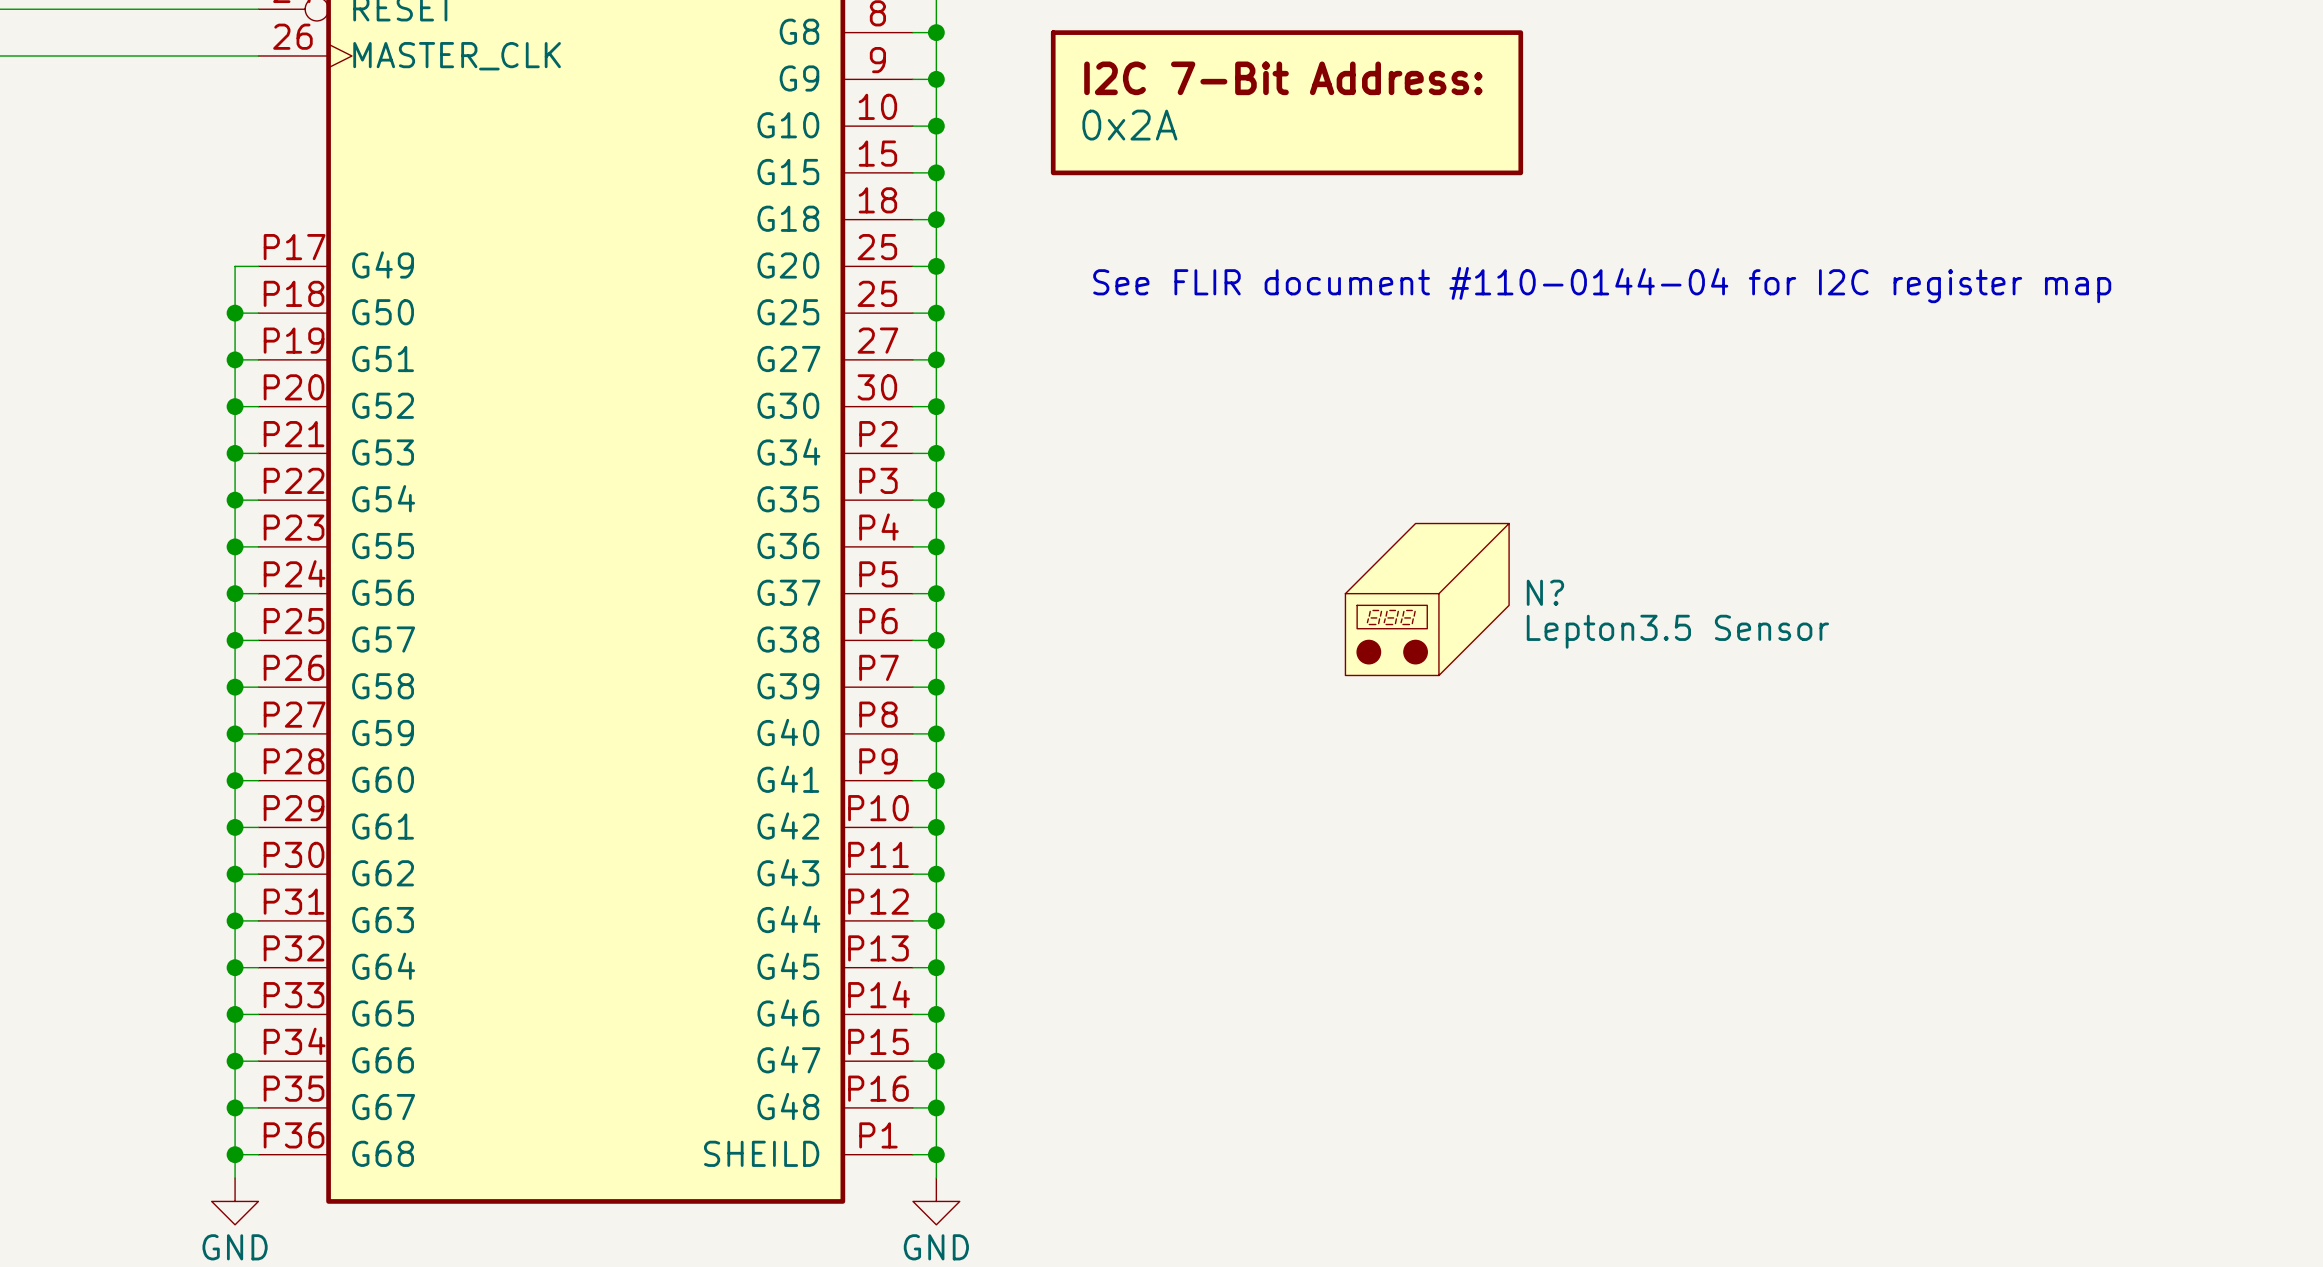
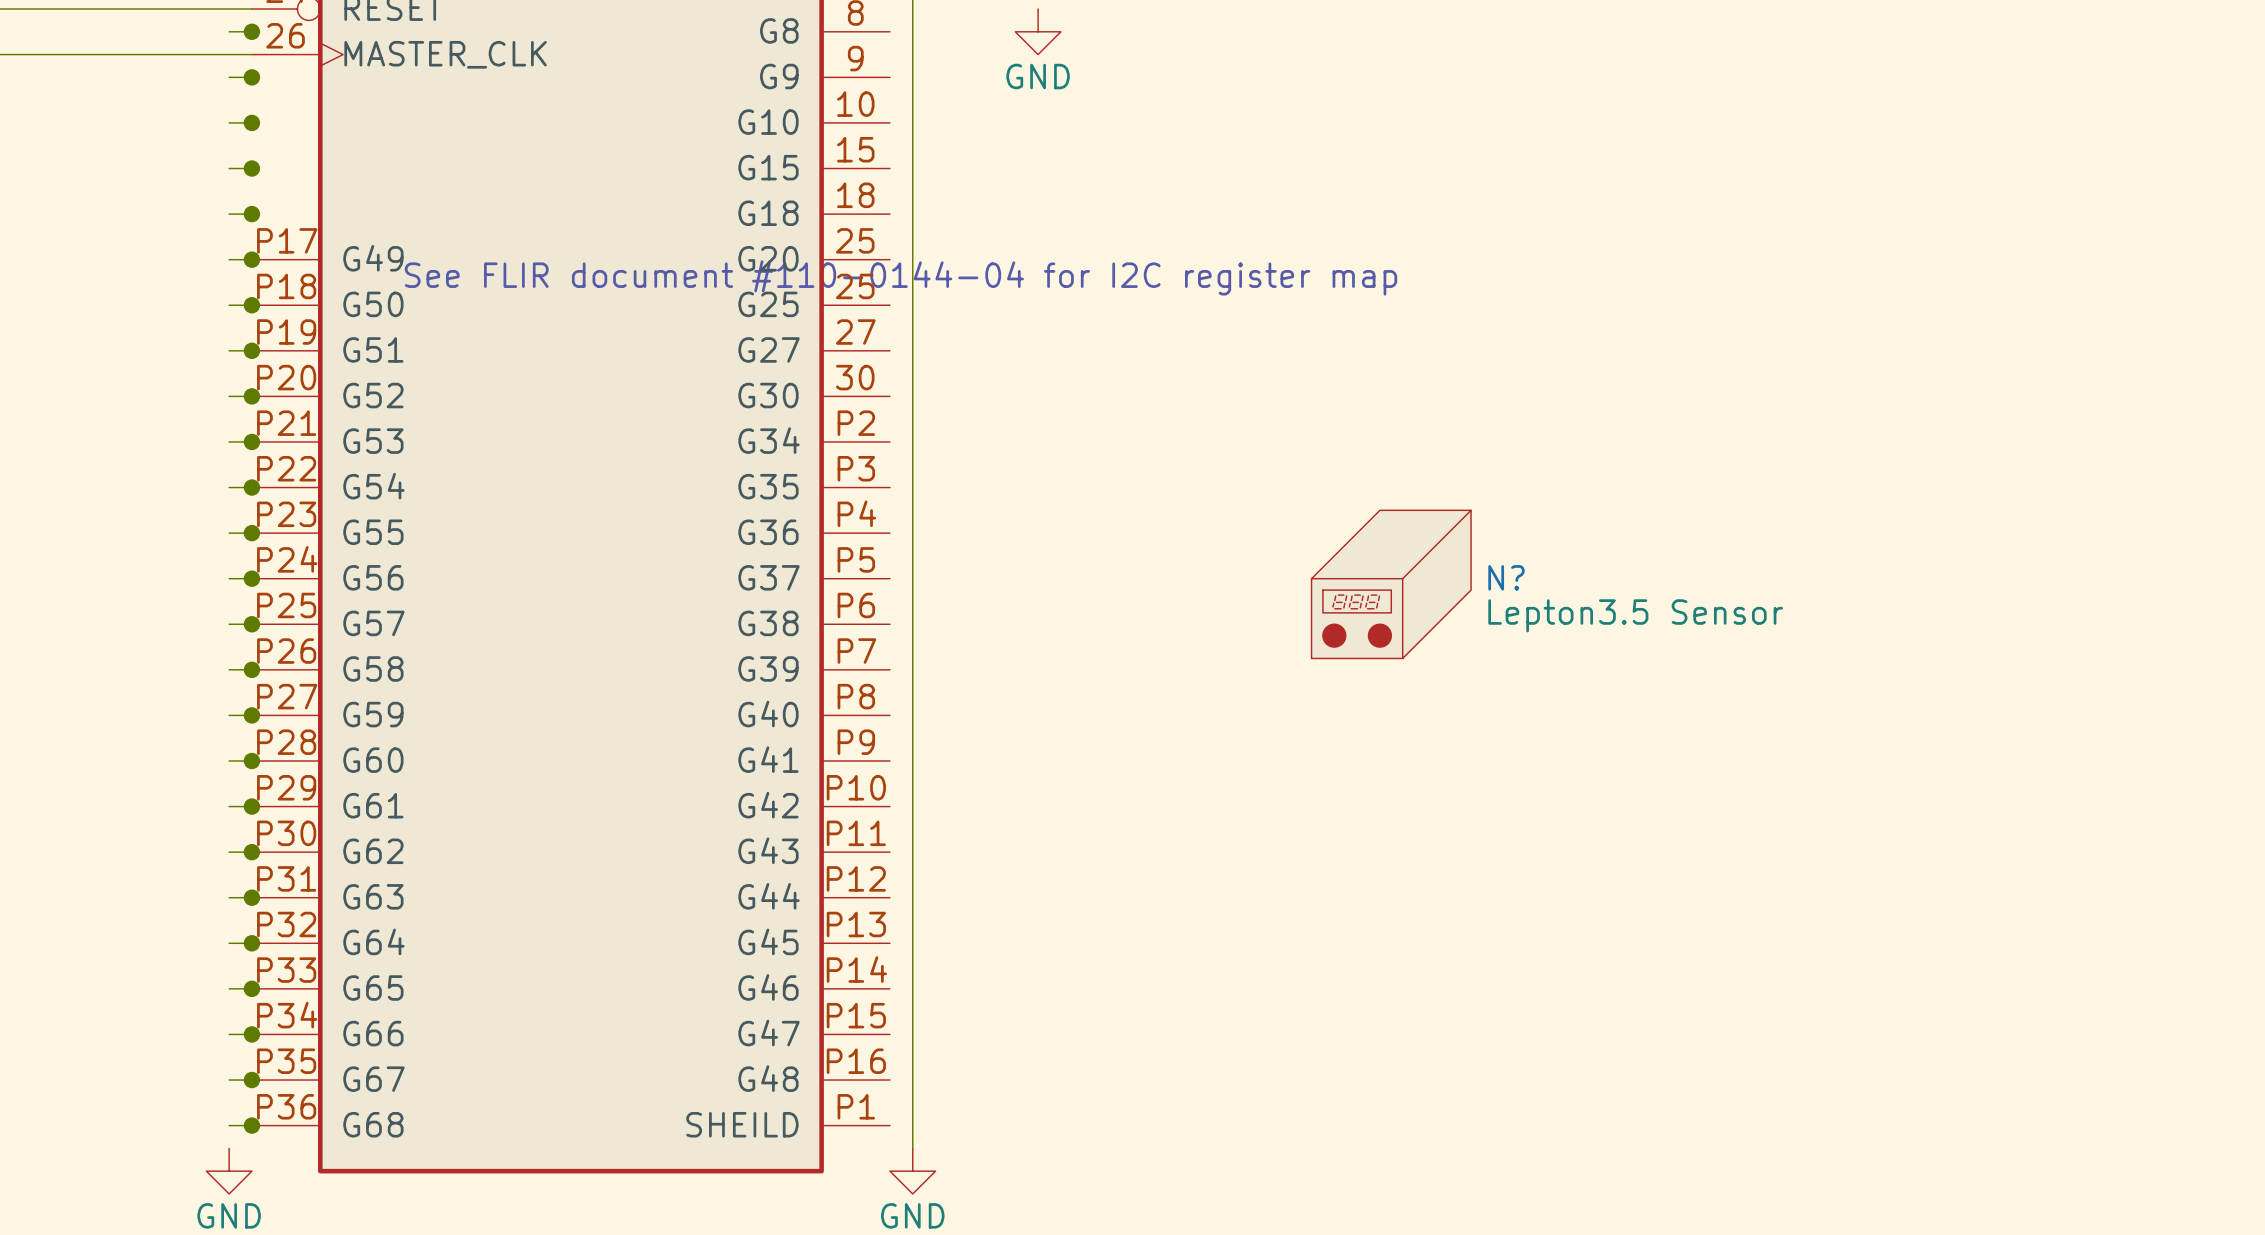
wire: none -> (229, 31) (251, 31)
junction: none -> (251, 31)
wire: (912, 32) (936, 32) -> none
junction: (936, 32) -> none
power symbol: none -> GND (1038, 31)
wire: none -> (229, 77) (251, 77)
junction: none -> (251, 77)
wire: (912, 79) (936, 79) -> none
junction: (936, 79) -> none
part: 0x2A (1287, 102) -> none
wire: none -> (229, 122) (251, 122)
junction: none -> (251, 122)
wire: (912, 126) (936, 126) -> none
junction: (936, 126) -> none
wire: none -> (229, 168) (251, 168)
junction: none -> (251, 168)
wire: (912, 172) (936, 172) -> none
junction: (936, 172) -> none
wire: none -> (229, 214) (251, 214)
junction: none -> (251, 214)
wire: (912, 219) (936, 219) -> none
junction: (936, 219) -> none
wire: (235, 266) (235, 1178) -> none
junction: none -> (251, 259)
wire: (912, 266) (936, 266) -> none
junction: (936, 266) -> none
text: none -> See FLIR document #110-0144-04 for I2C register map (900, 277)
text: See FLIR document #110-0144-04 for I2C register map (1602, 285) -> none
junction position: (235, 313) -> (251, 305)
wire: (912, 313) (936, 313) -> none
junction: (936, 313) -> none
junction position: (235, 359) -> (251, 350)
wire: (912, 359) (936, 359) -> none
junction: (936, 359) -> none
junction position: (235, 406) -> (251, 396)
wire: (912, 406) (936, 406) -> none
junction: (936, 406) -> none
junction position: (235, 453) -> (251, 441)
wire: (912, 453) (936, 453) -> none
junction: (936, 453) -> none
junction position: (235, 500) -> (251, 487)
wire: (912, 500) (936, 500) -> none
junction: (936, 500) -> none
junction position: (235, 546) -> (251, 533)
wire: (912, 546) (936, 546) -> none
junction: (936, 546) -> none
junction position: (235, 593) -> (251, 578)
wire: (912, 593) (936, 593) -> none
junction: (936, 593) -> none
junction position: (235, 640) -> (251, 624)
wire: (912, 640) (936, 640) -> none
junction: (936, 640) -> none
junction position: (235, 687) -> (251, 669)
wire: (912, 687) (936, 687) -> none
junction: (936, 687) -> none
junction position: (235, 733) -> (251, 715)
wire: (912, 733) (936, 733) -> none
junction: (936, 733) -> none
junction position: (235, 780) -> (251, 760)
wire: (912, 780) (936, 780) -> none
junction: (936, 780) -> none
junction position: (235, 827) -> (251, 806)
wire: (912, 827) (936, 827) -> none
junction: (936, 827) -> none
junction position: (235, 874) -> (251, 852)
wire: (912, 874) (936, 874) -> none
junction: (936, 874) -> none
junction position: (235, 920) -> (251, 897)
wire: (912, 920) (936, 920) -> none
junction: (936, 920) -> none
junction position: (235, 967) -> (251, 943)
wire: (912, 967) (936, 967) -> none
junction: (936, 967) -> none
junction position: (235, 1014) -> (251, 988)
wire: (912, 1014) (936, 1014) -> none
junction: (936, 1014) -> none
junction position: (235, 1061) -> (251, 1034)
wire: (912, 1061) (936, 1061) -> none
junction: (936, 1061) -> none
junction position: (235, 1107) -> (251, 1080)
wire: (912, 1107) (936, 1107) -> none
junction: (936, 1107) -> none
junction position: (235, 1154) -> (251, 1125)
wire: (912, 1154) (936, 1154) -> none
junction: (936, 1154) -> none

